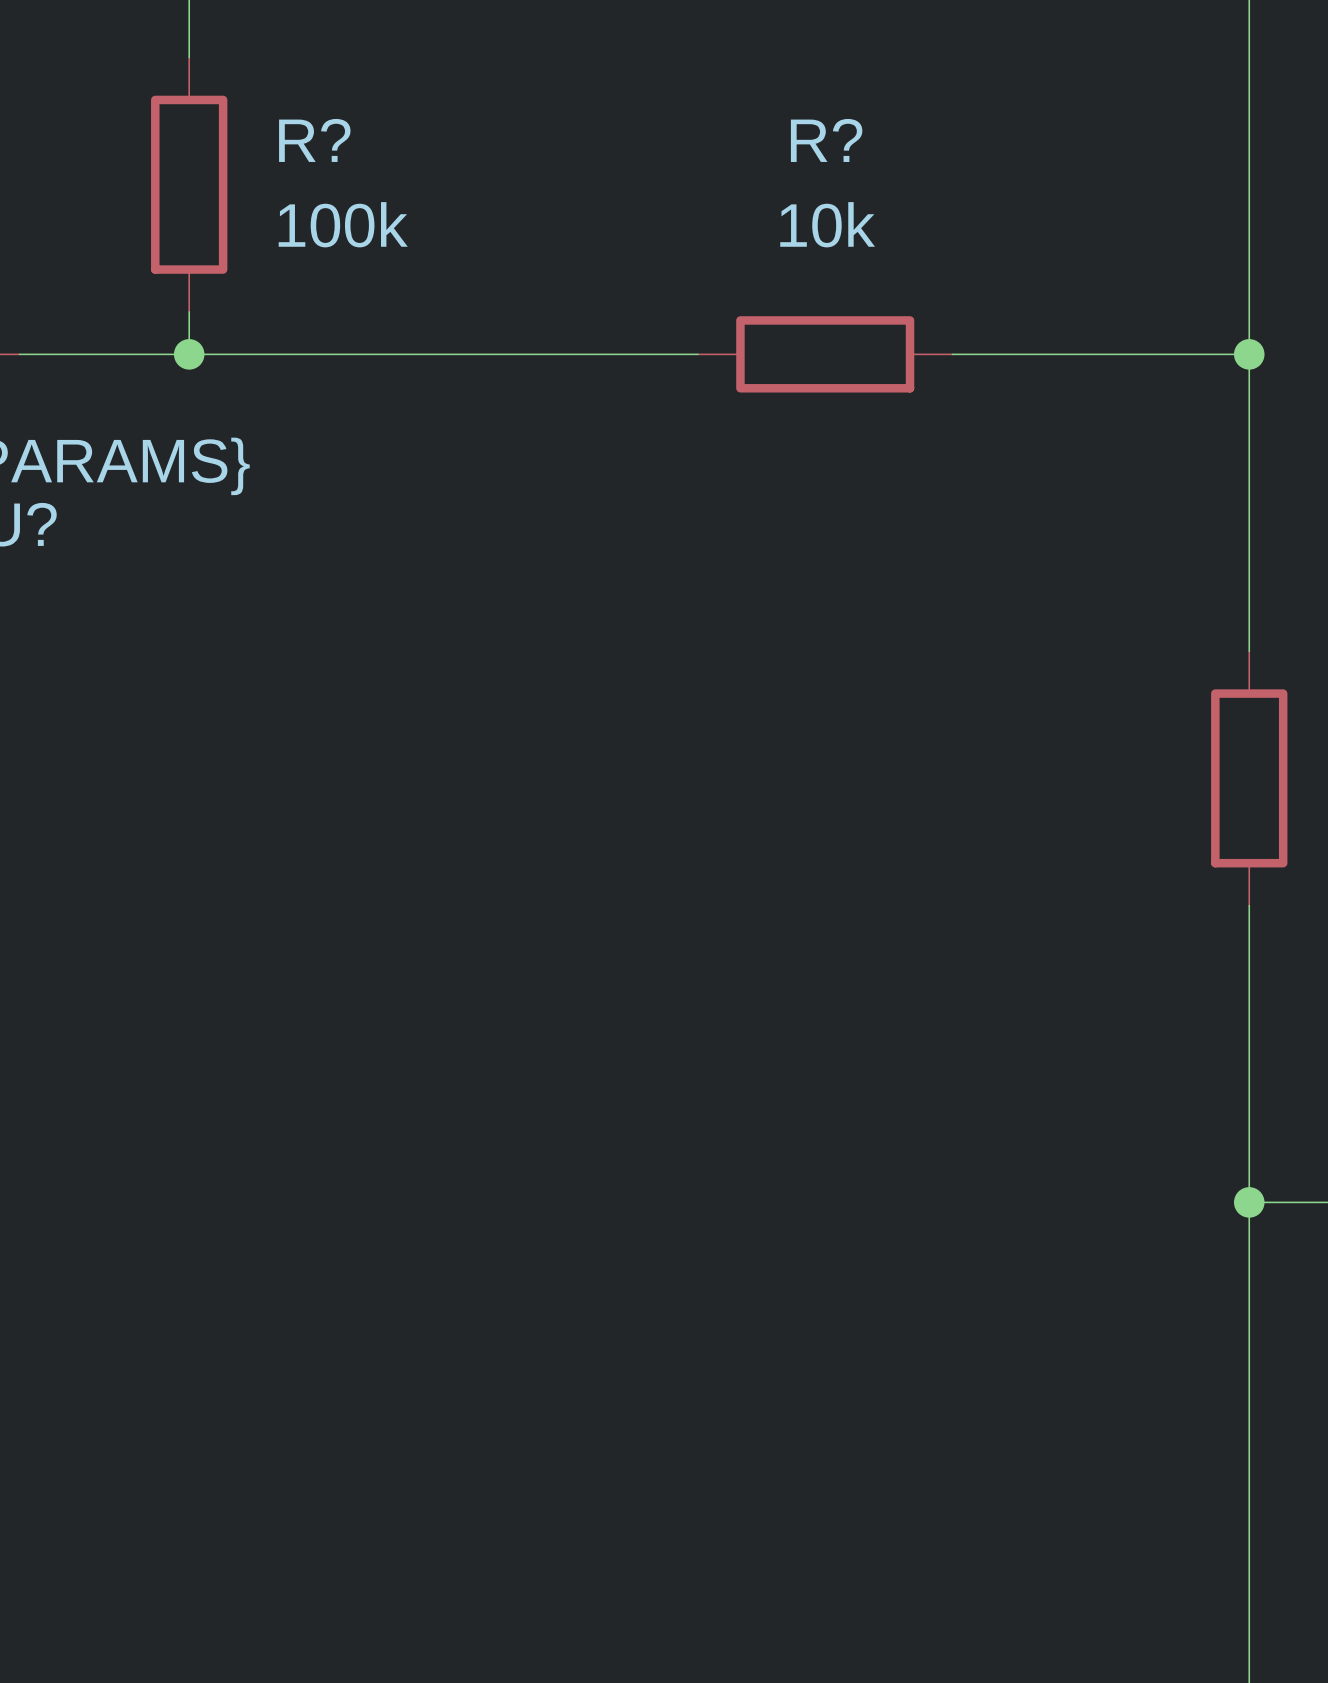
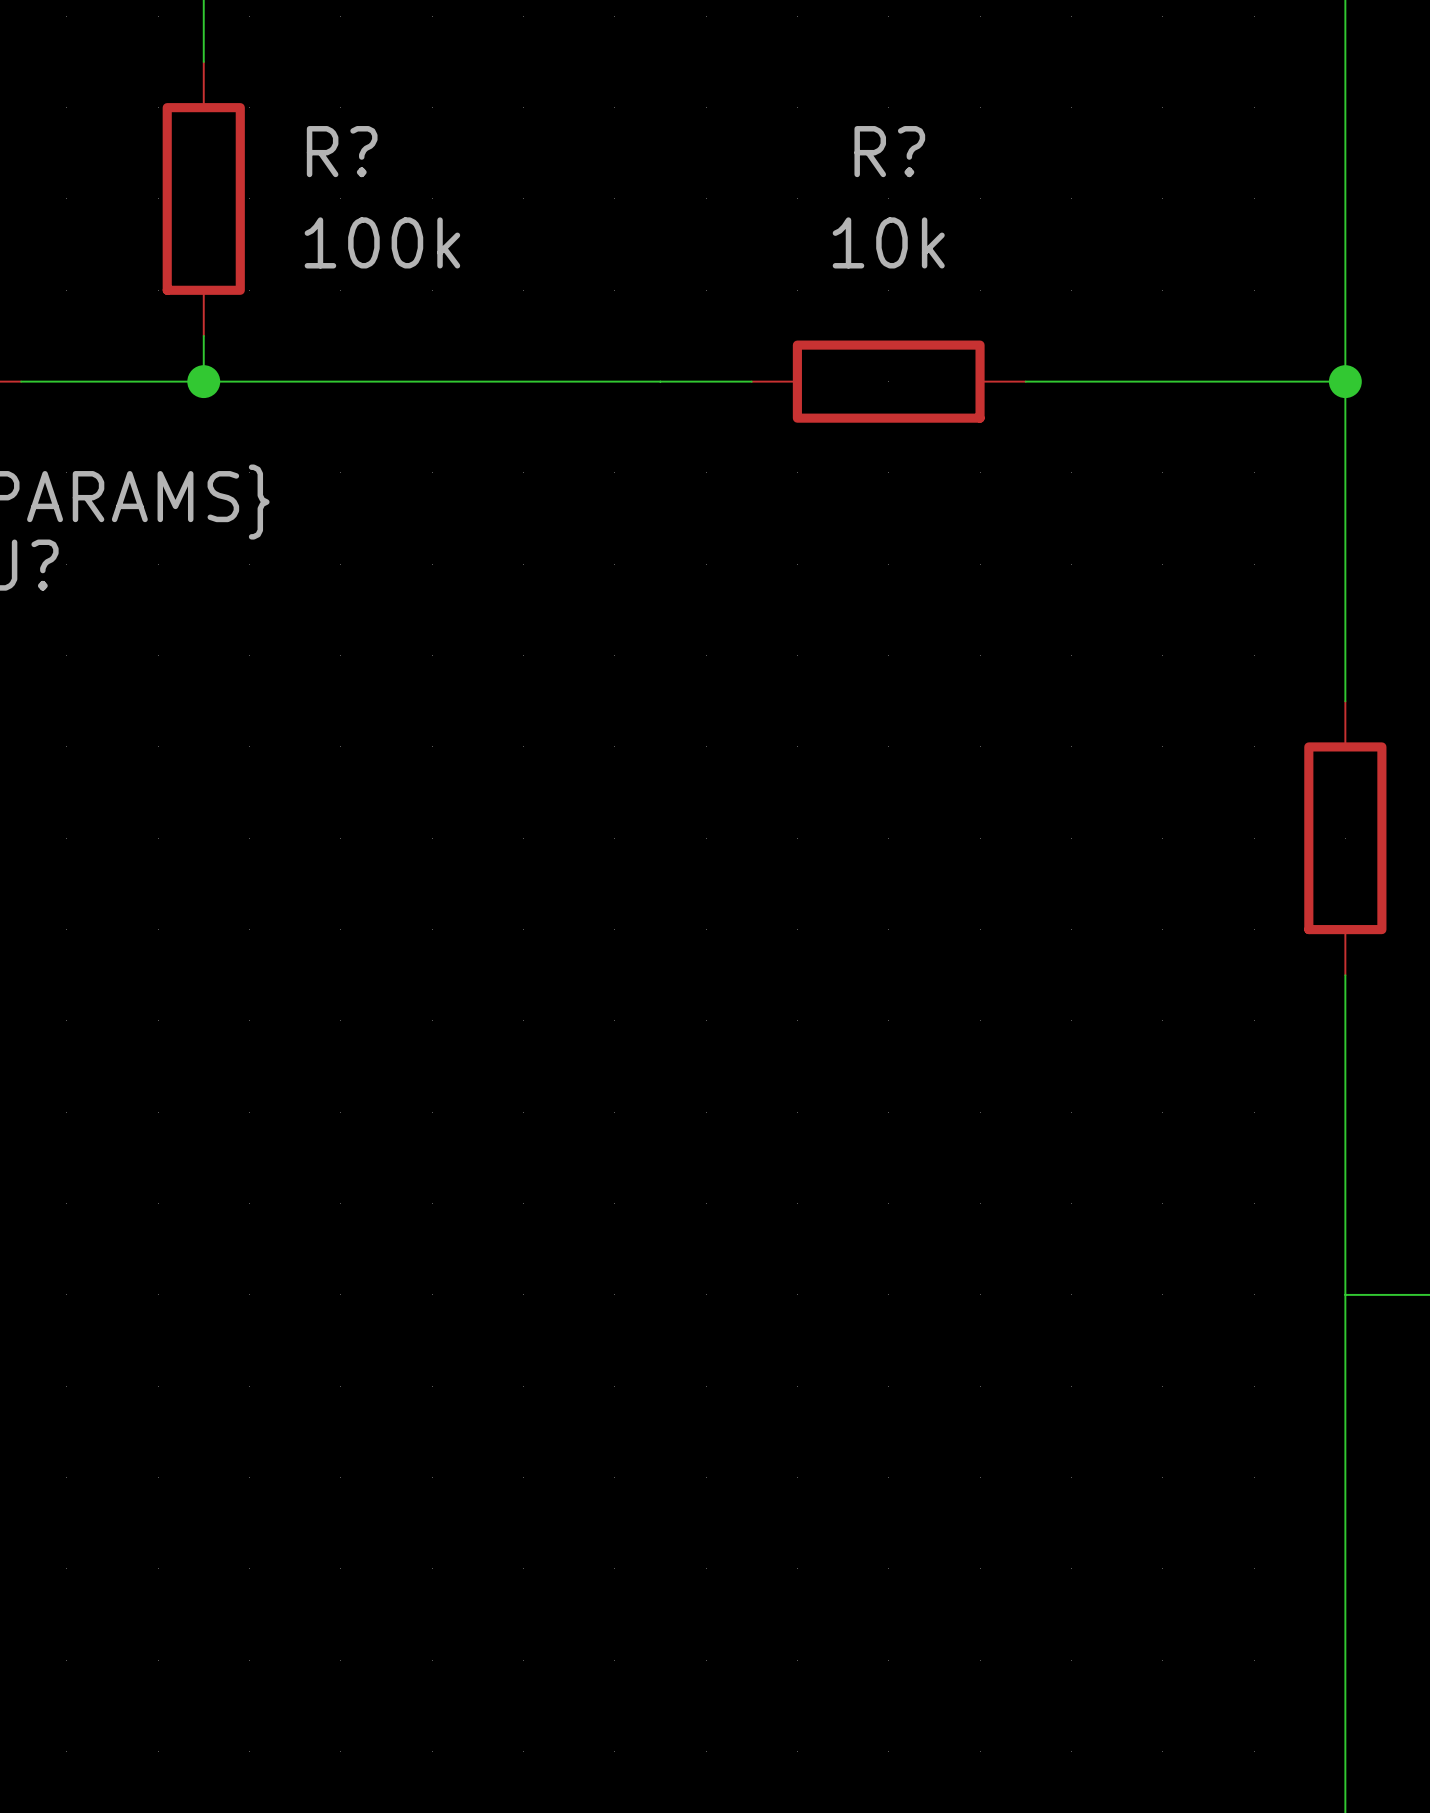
junction: (1249, 1202) -> none

